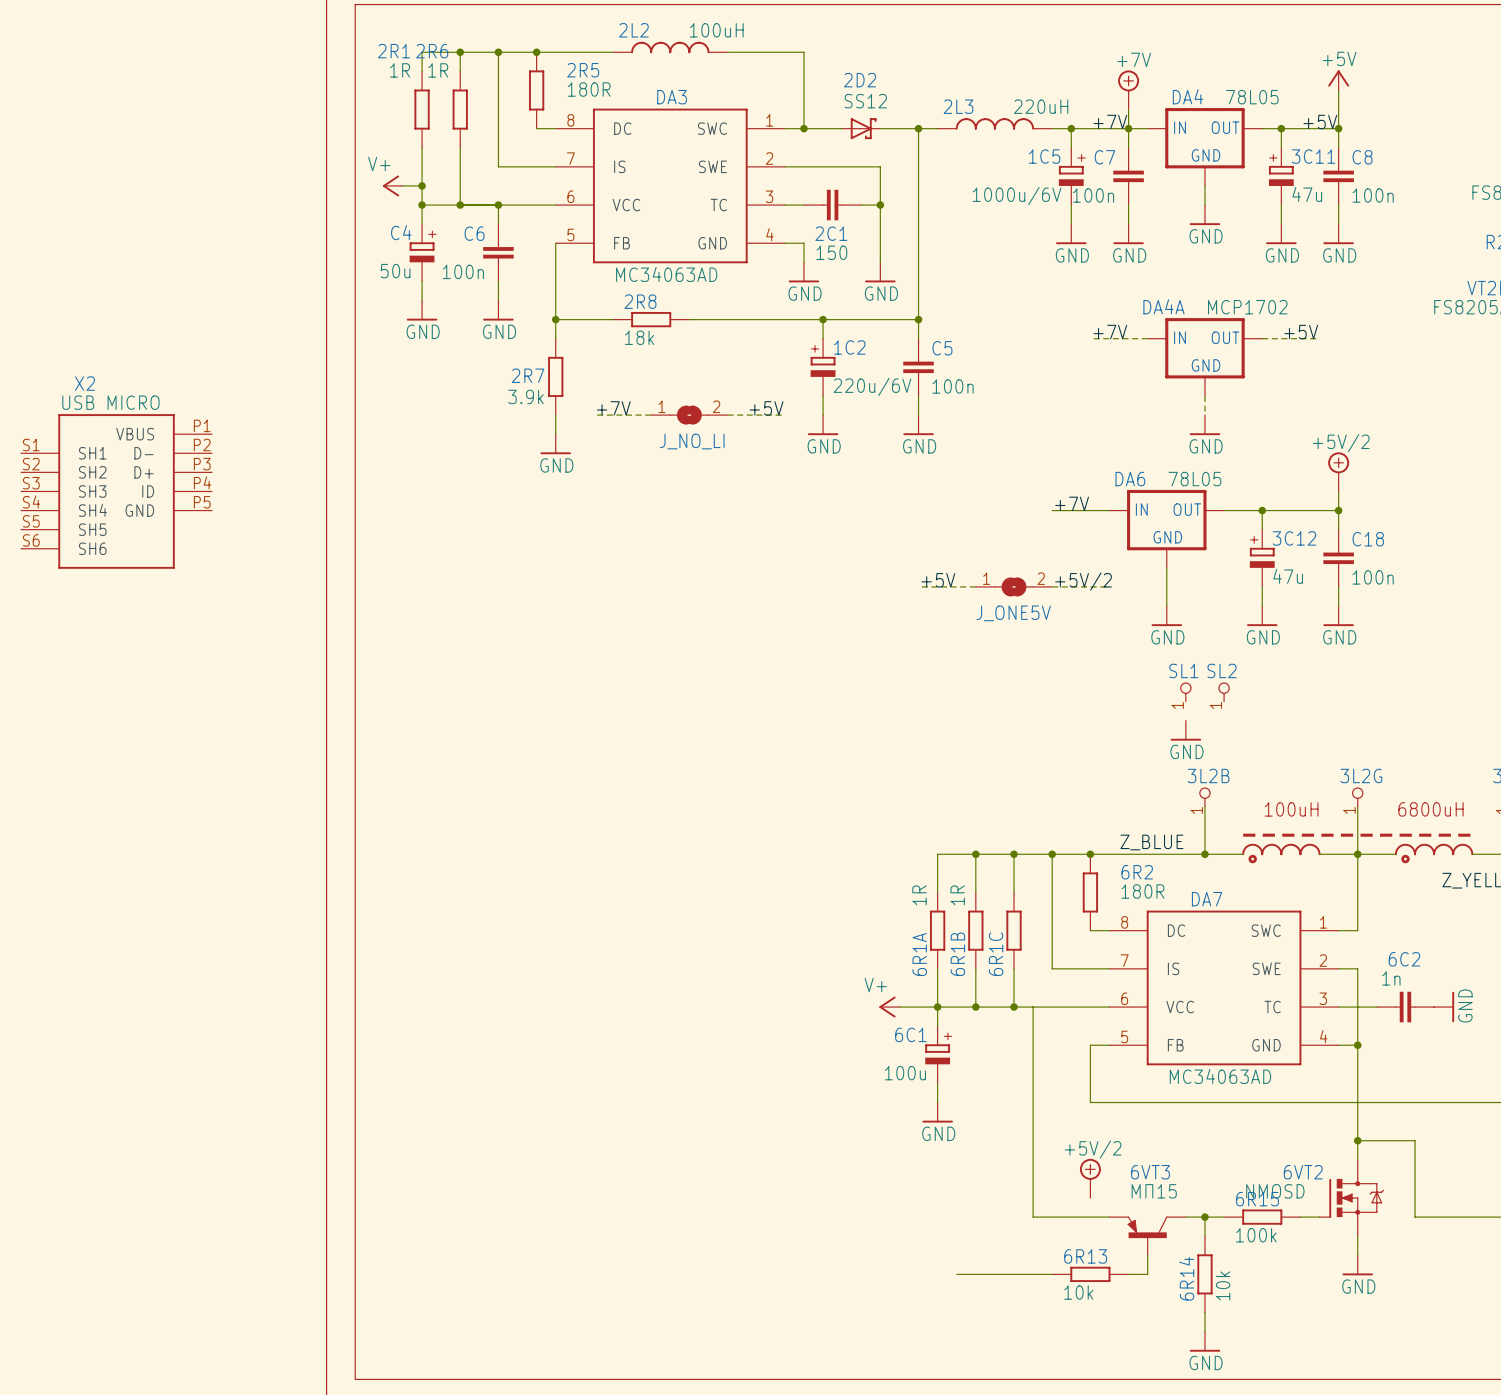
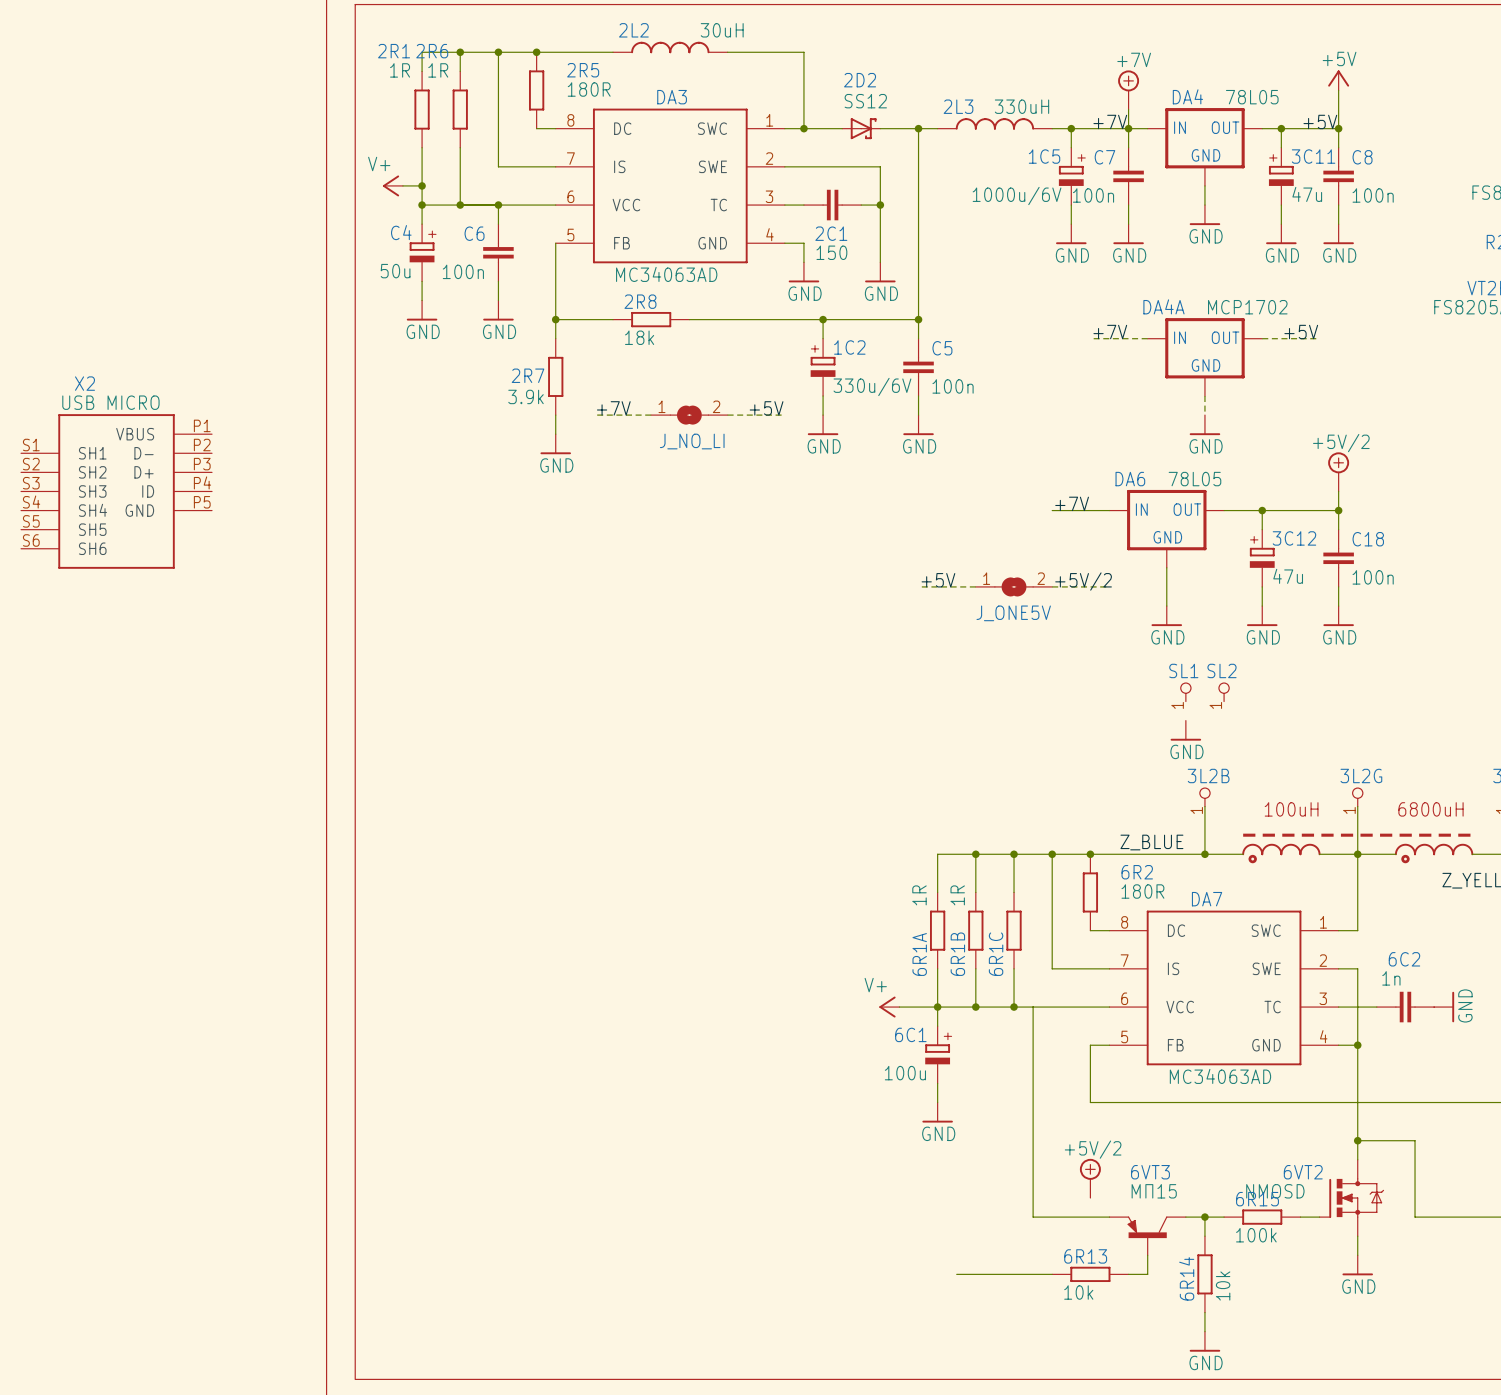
2L2 value: 100uH (716, 30) -> 30uH (722, 30)
2L3 value: 220uH (1041, 106) -> 330uH (1022, 106)
1C2 value: 220u/6V (872, 386) -> 330u/6V (872, 386)

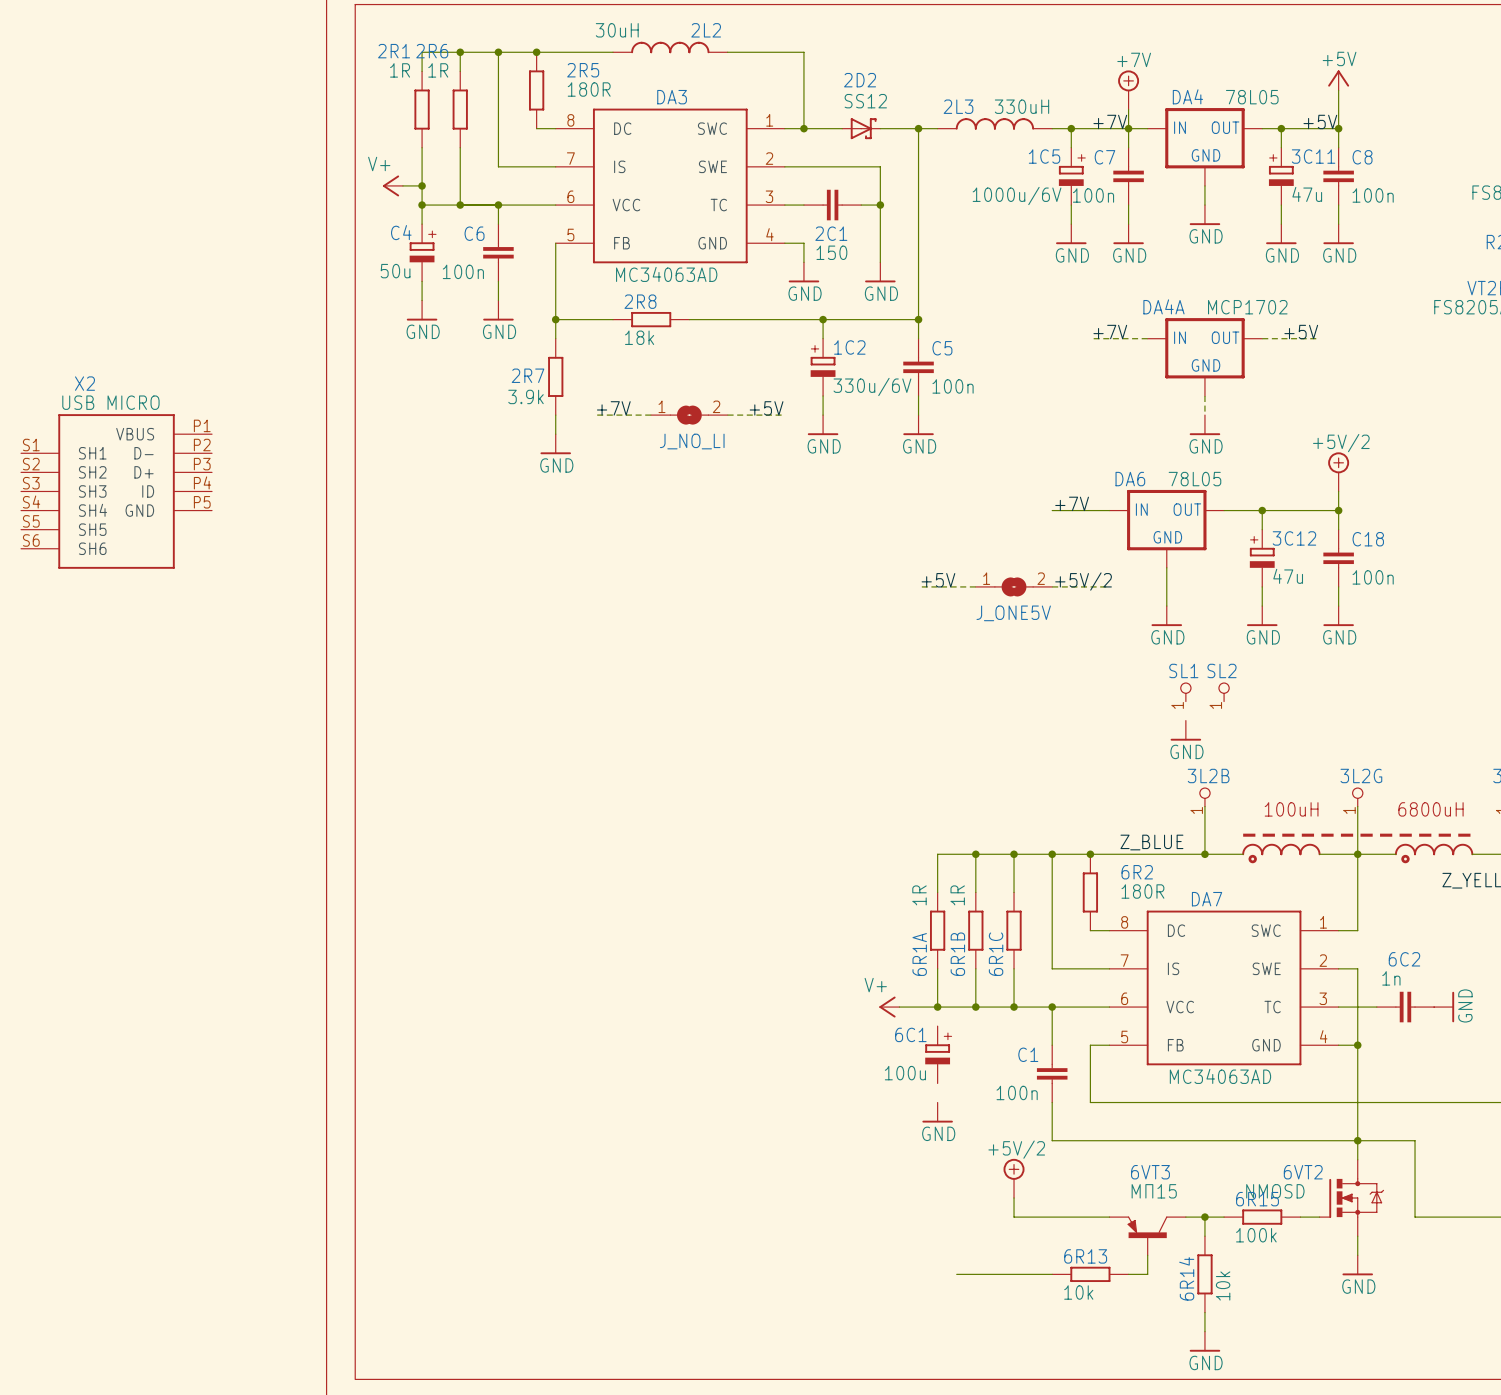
2L2 name position: 2L2 (633, 30) -> 2L2 (706, 30)
2L2 value position: 30uH (722, 30) -> 30uH (617, 30)
wire: (937, 1007) (937, 1026) -> none
wire: (1033, 1007) (1033, 1217) -> (1014, 1198) (1014, 1217) (1033, 1217)
wire: none -> (1052, 1007) (1052, 1045)
junction: none -> (1052, 1007)
C1: none -> 100n (1052, 1073)
wire: (937, 1083) (937, 1102) -> none
wire: none -> (1052, 1102) (1052, 1140) (1357, 1140)
power symbol position: +5V/2 (1090, 1178) -> +5V/2 (1014, 1178)

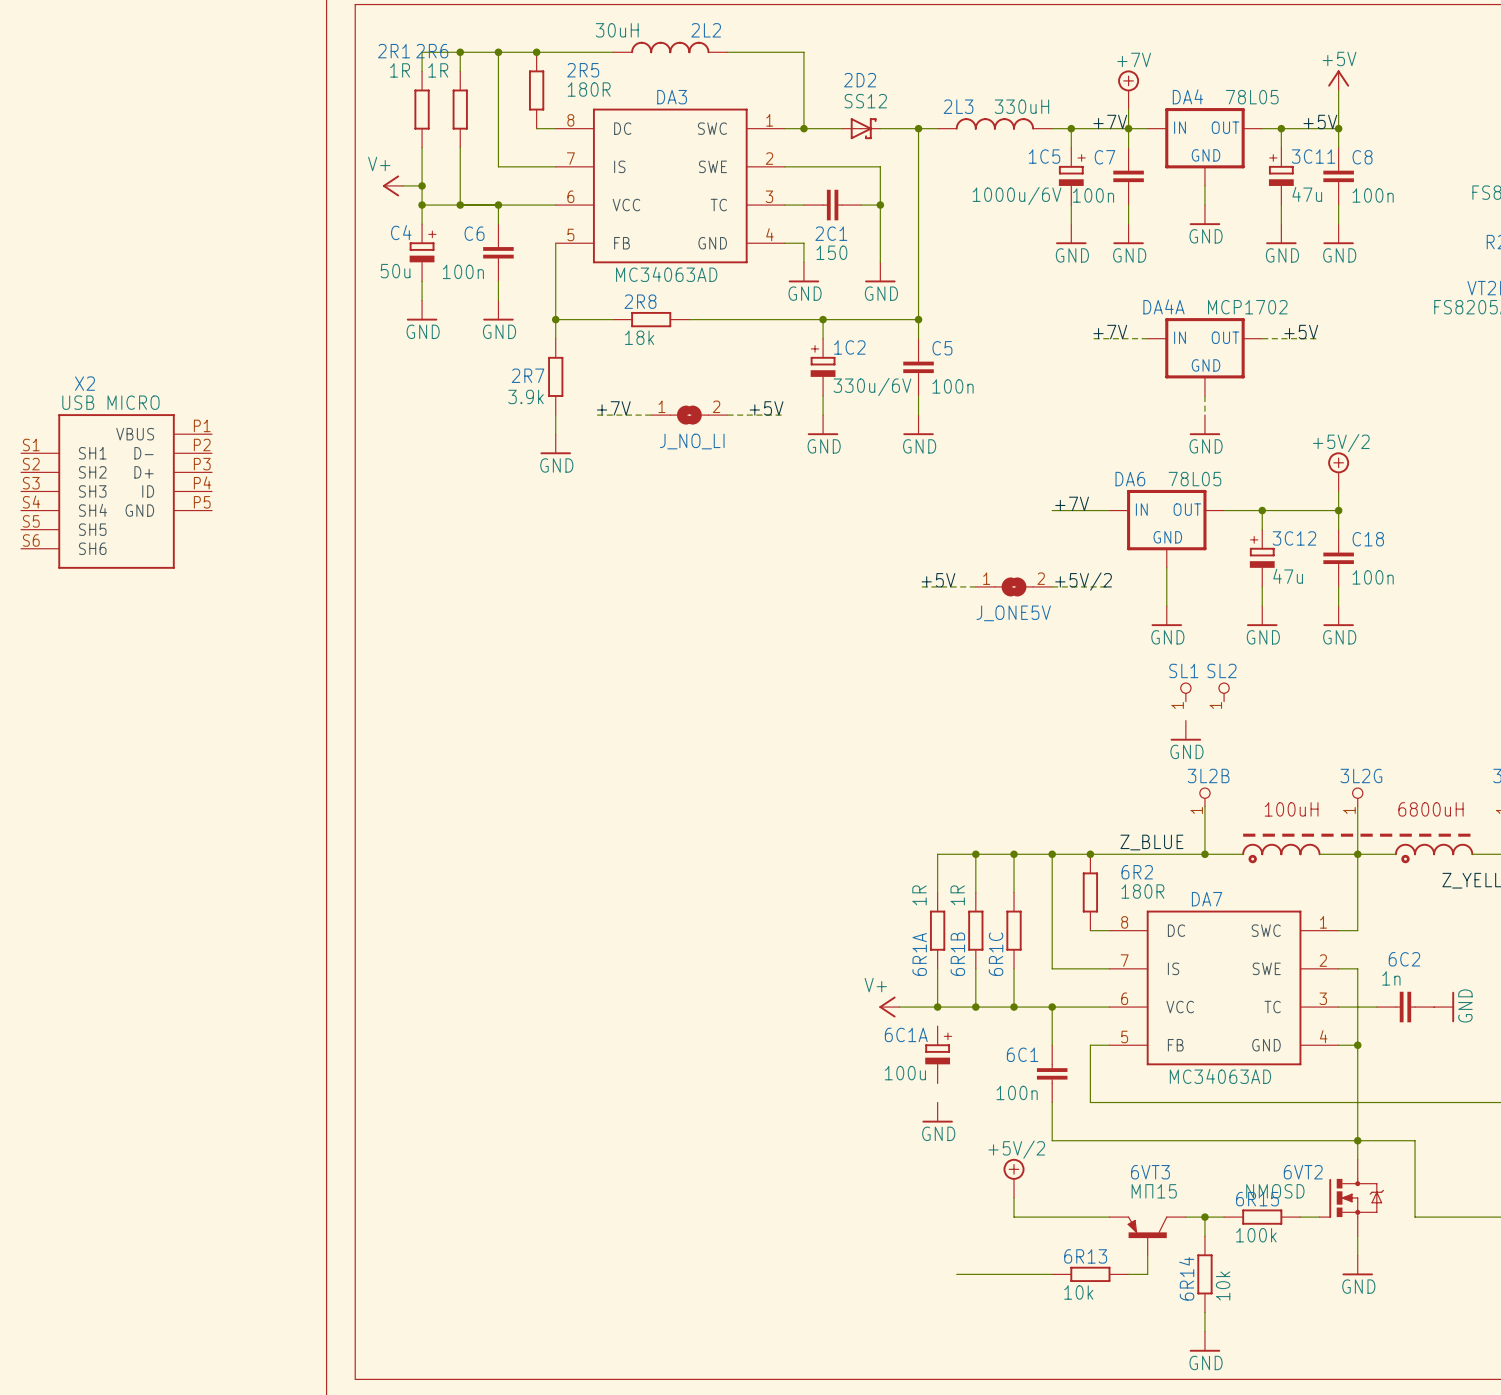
6C1 name: 6C1 (910, 1034) -> 6C1A (906, 1034)
C1 name: C1 (1028, 1054) -> 6C1 (1022, 1054)

